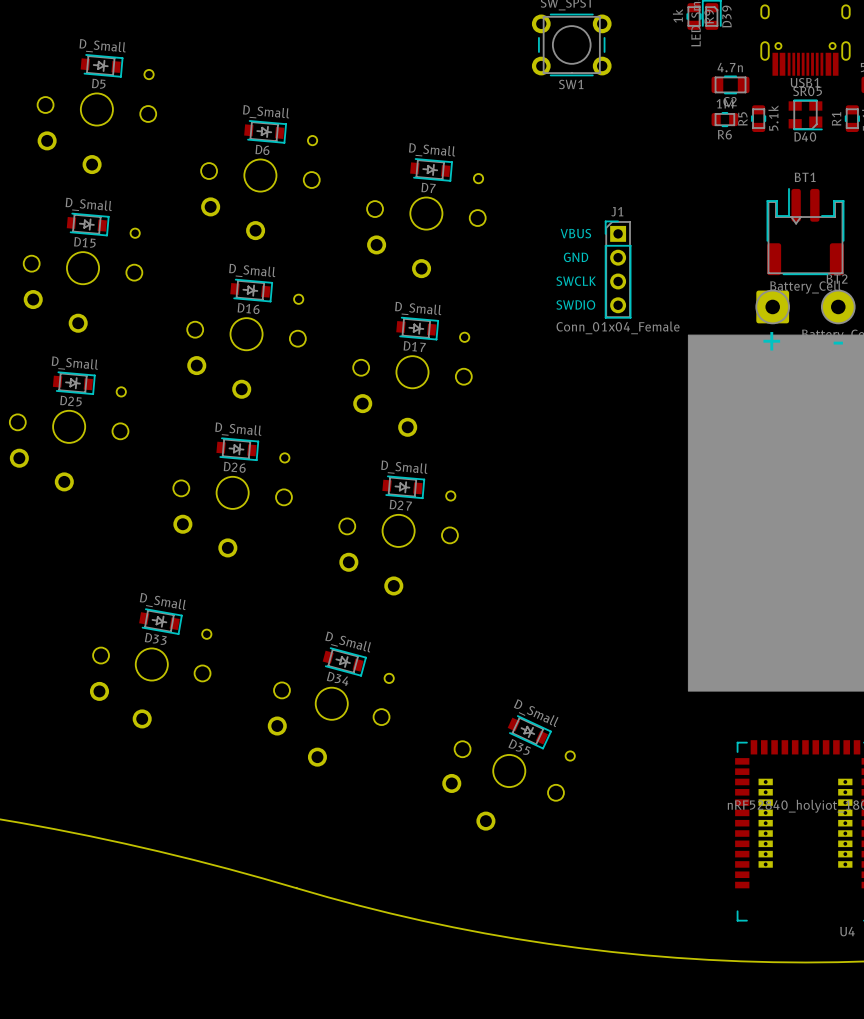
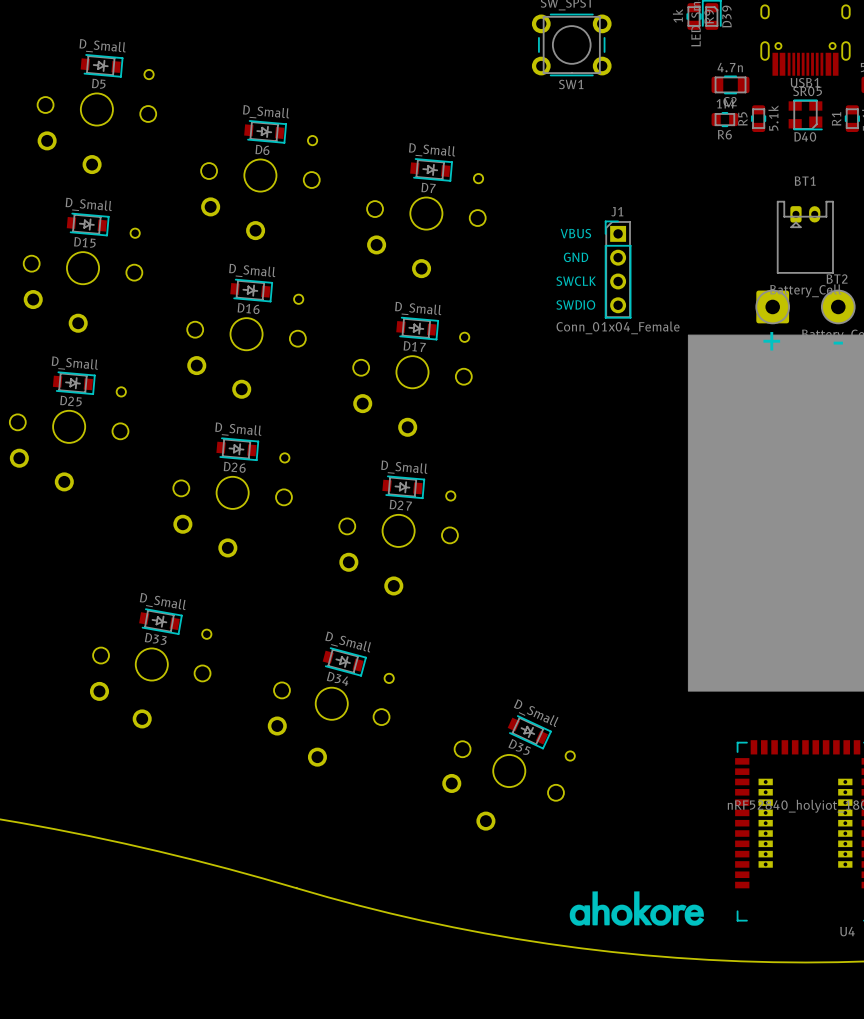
BT1 footprint: [766, 188, 845, 276] -> [777, 201, 834, 274]
drawing: none -> [569, 891, 705, 926]

